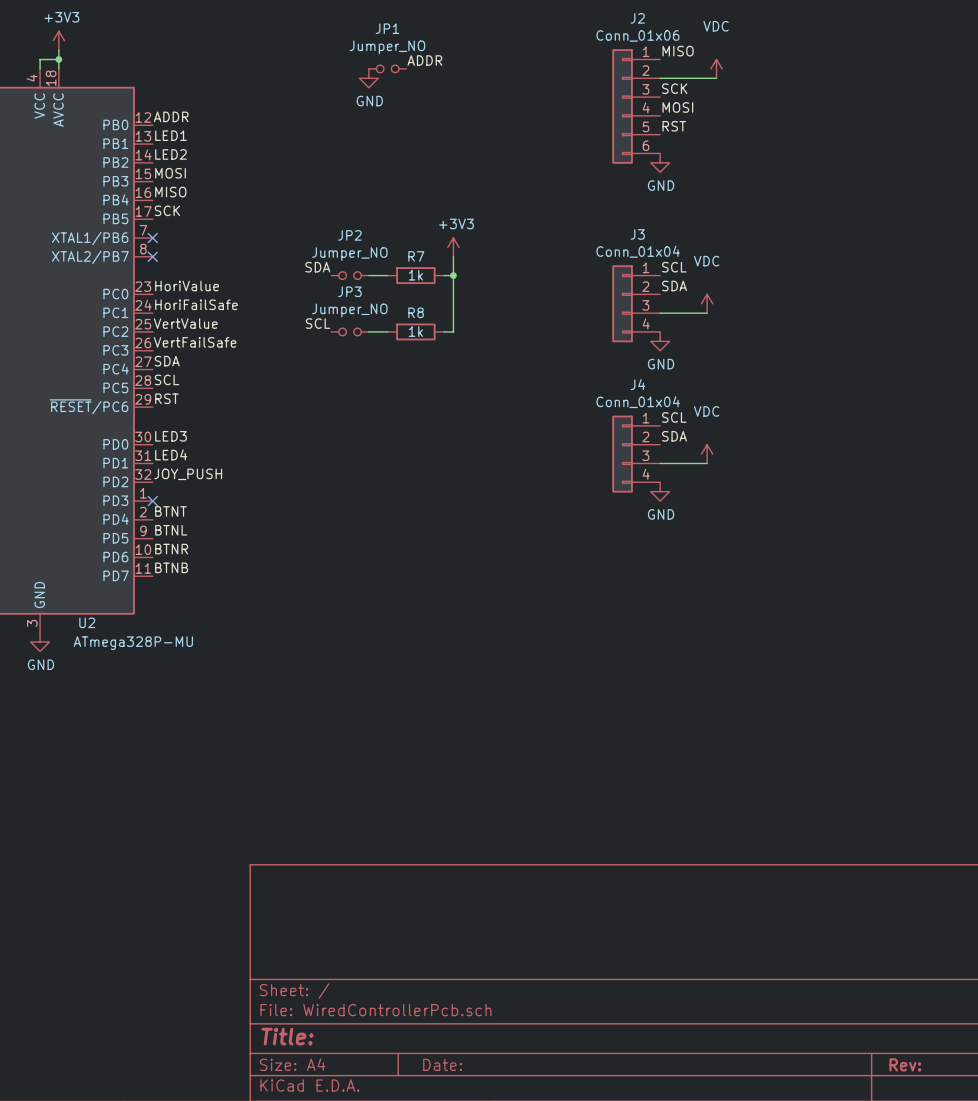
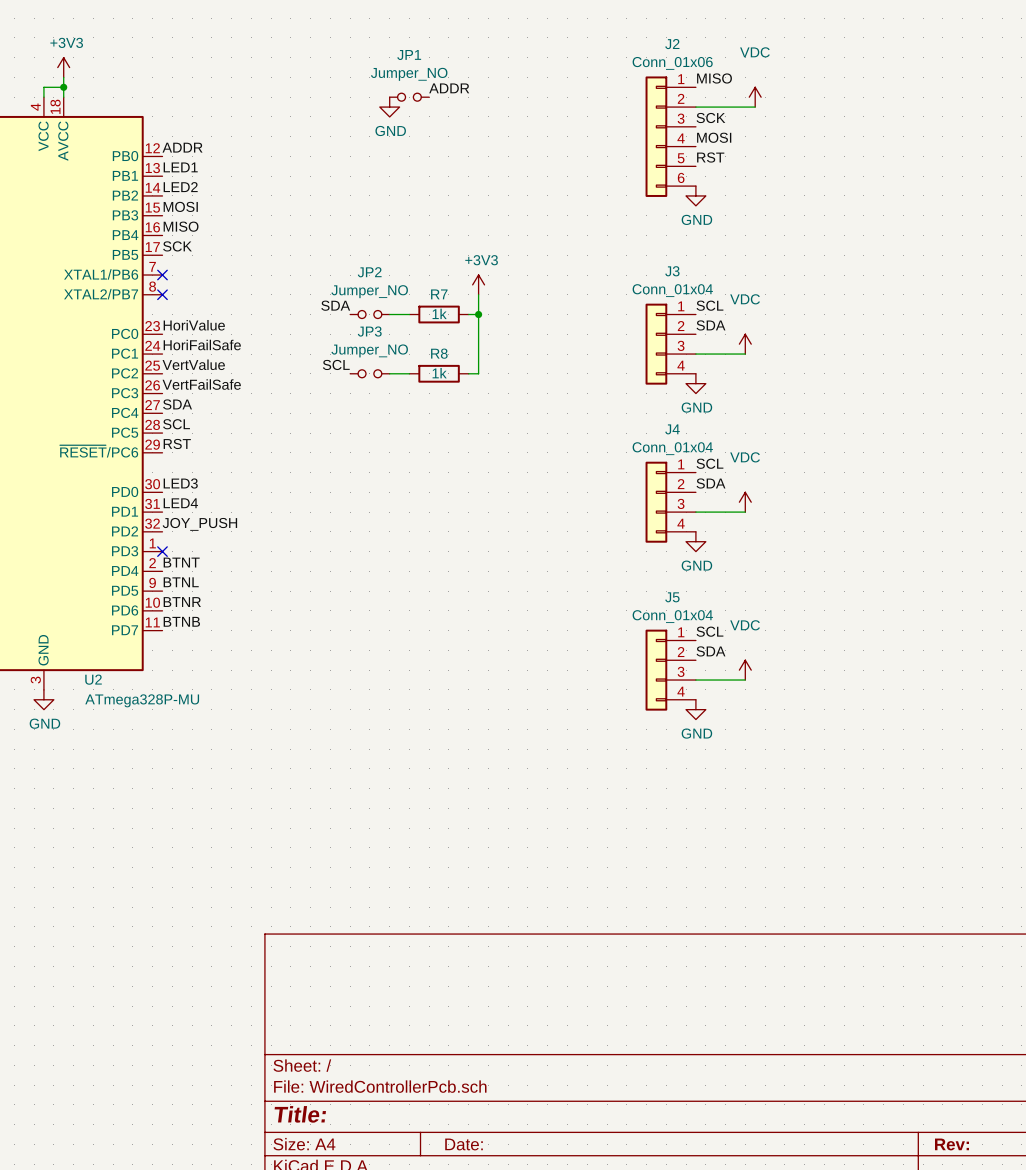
label: none -> SCL (709, 631)
label: none -> SDA (710, 651)
J5: none -> Conn_01x04 (670, 670)
power symbol: none -> VDC (745, 670)
wire: none -> (695, 680) (745, 680)
power symbol: none -> GND (695, 709)

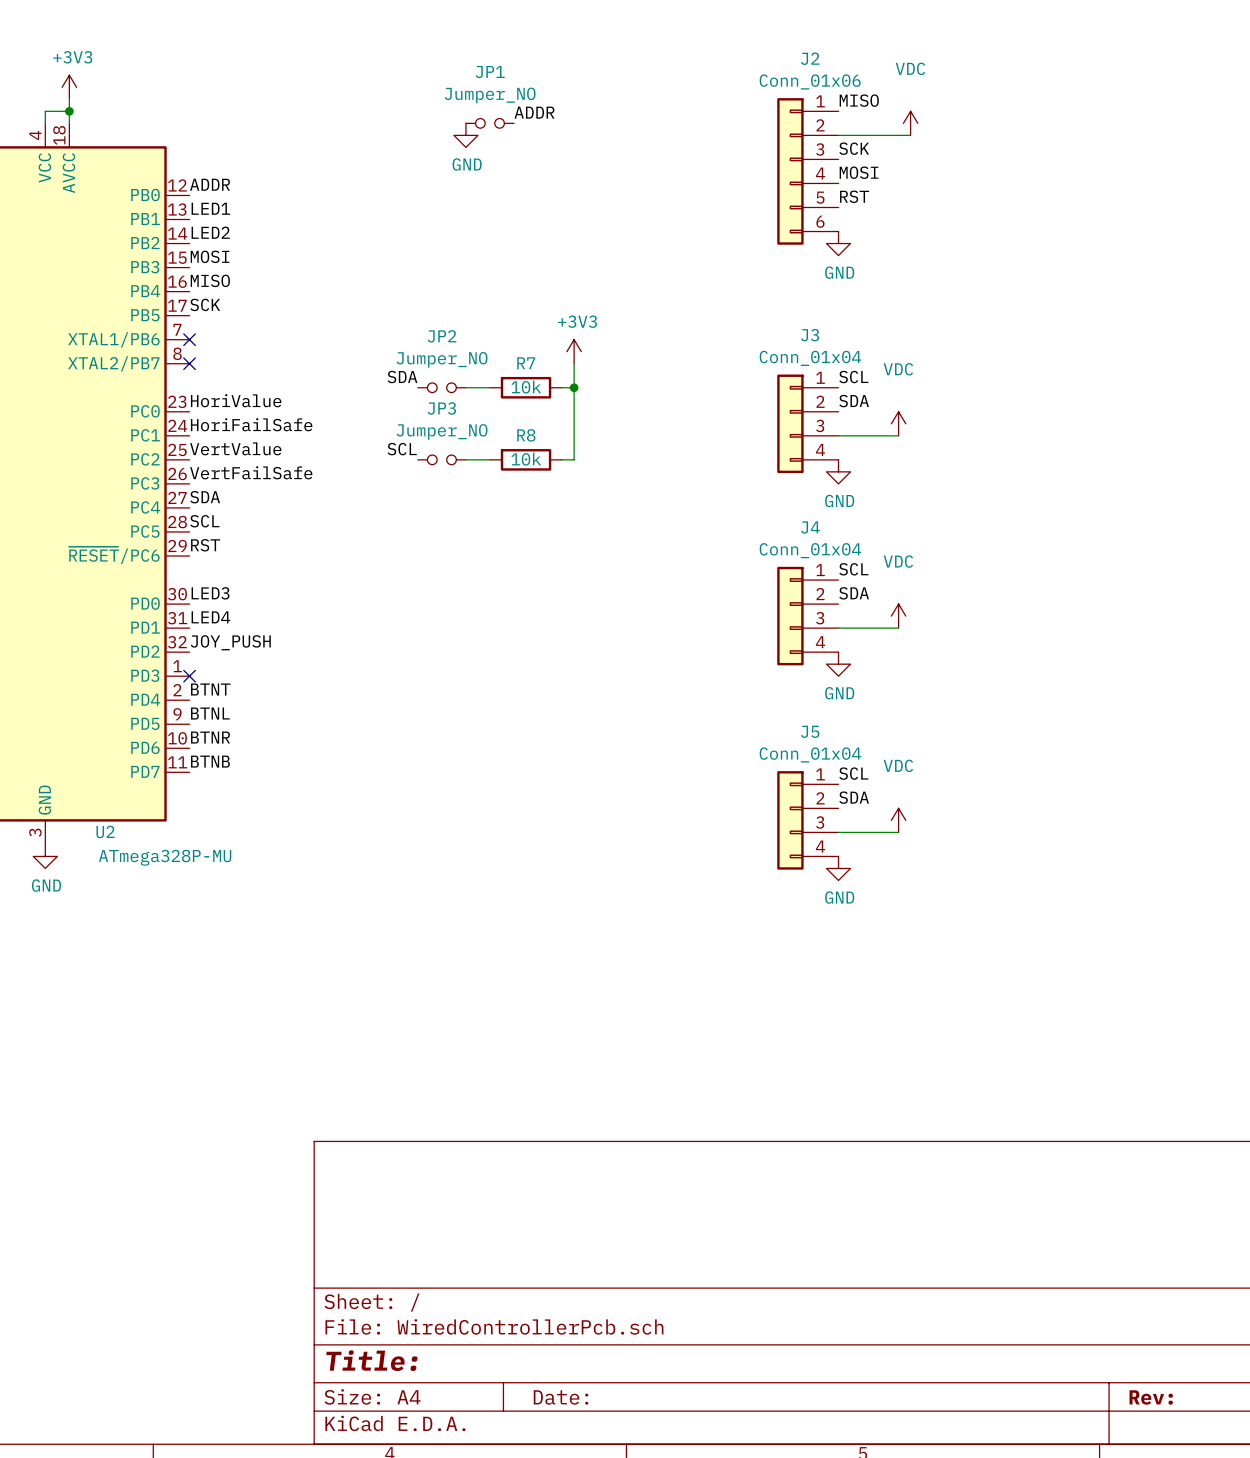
R7 value: 1k (439, 313) -> 10k (526, 387)
R8 value: 1k (439, 373) -> 10k (526, 459)

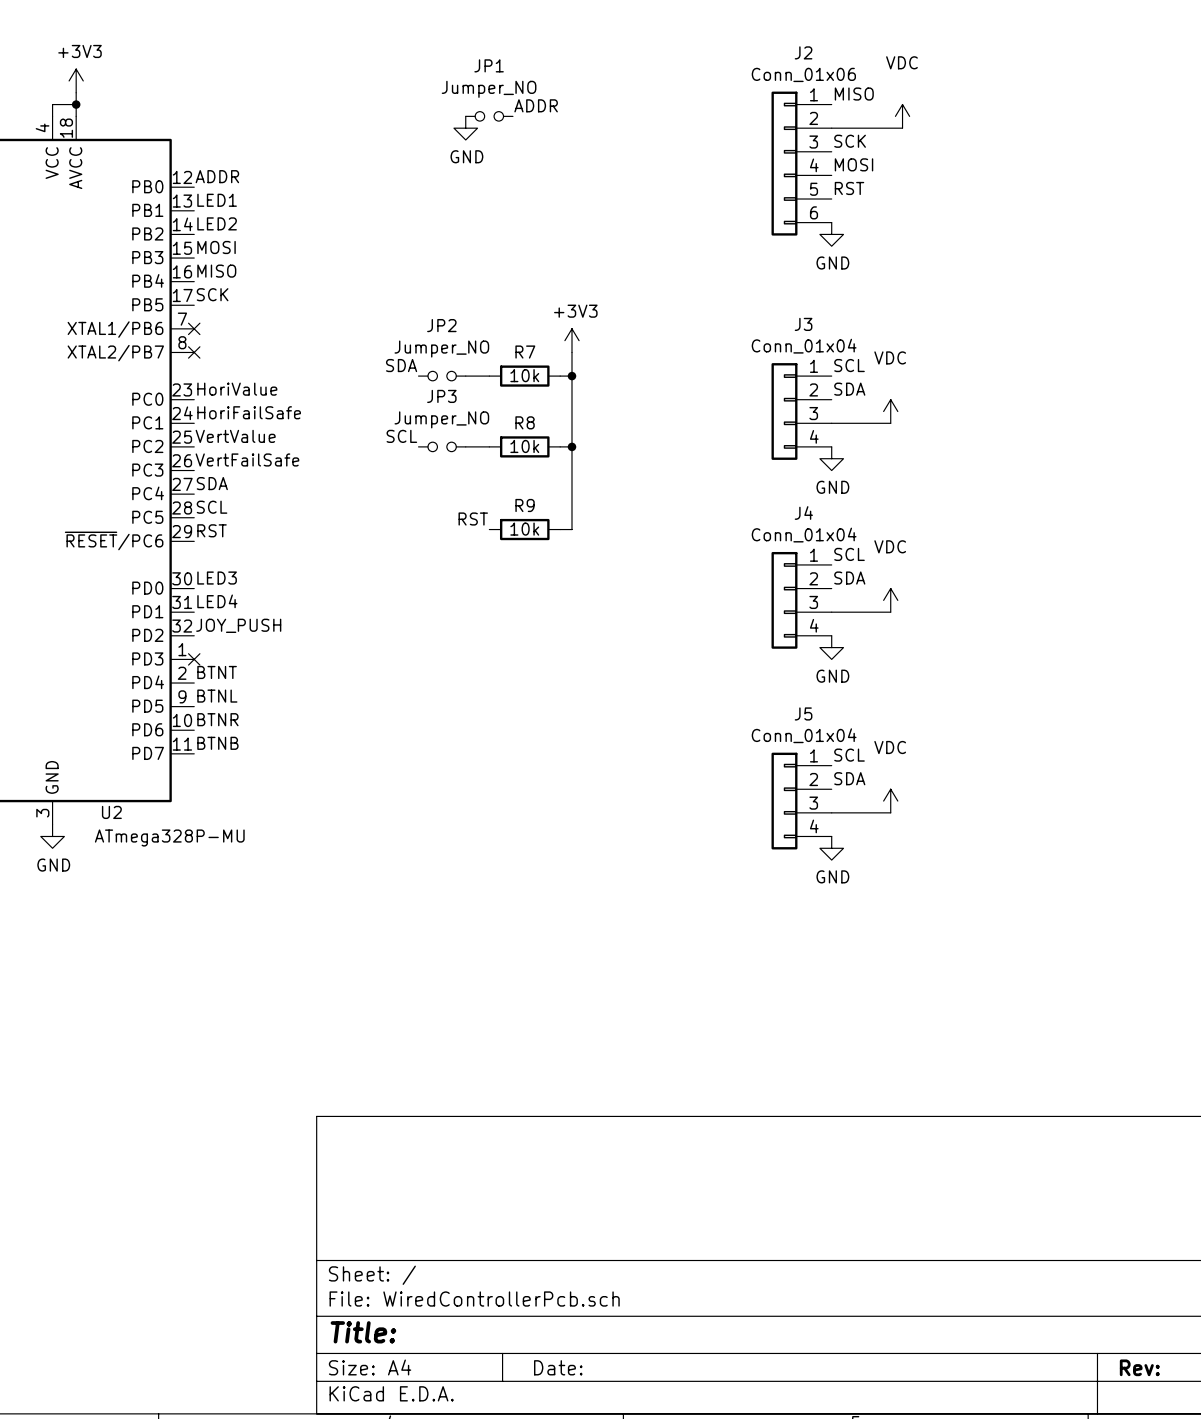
wire: none -> (571, 446) (571, 529) (560, 529)
junction: none -> (571, 446)
label: none -> RST (473, 519)
R9: none -> 10k (524, 529)

